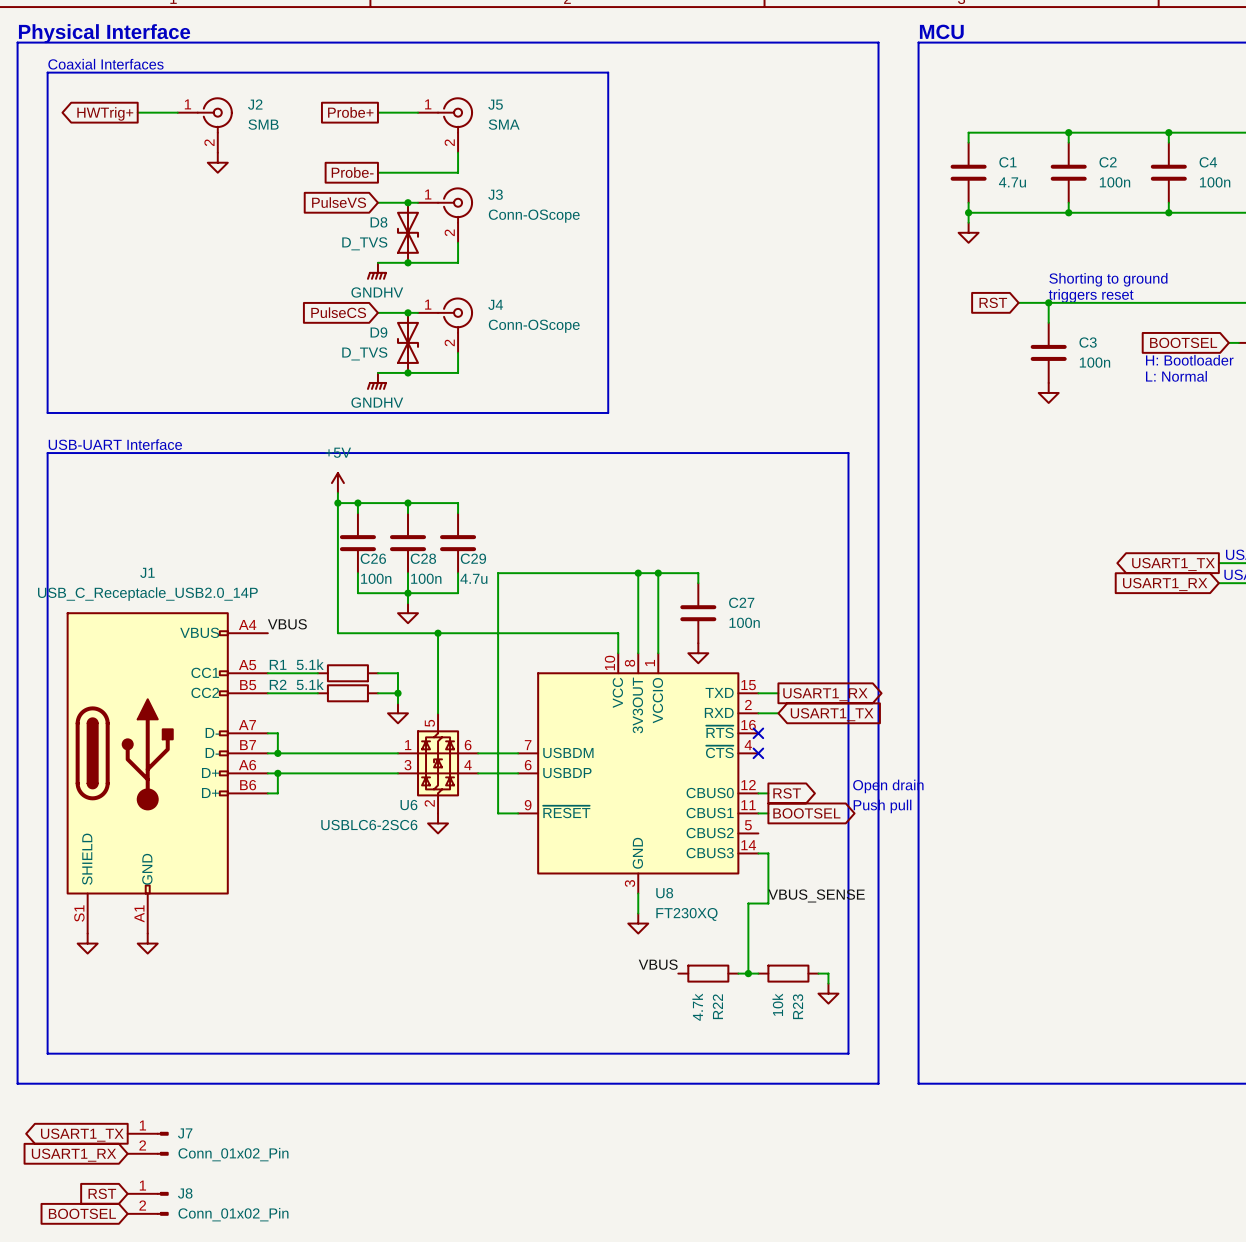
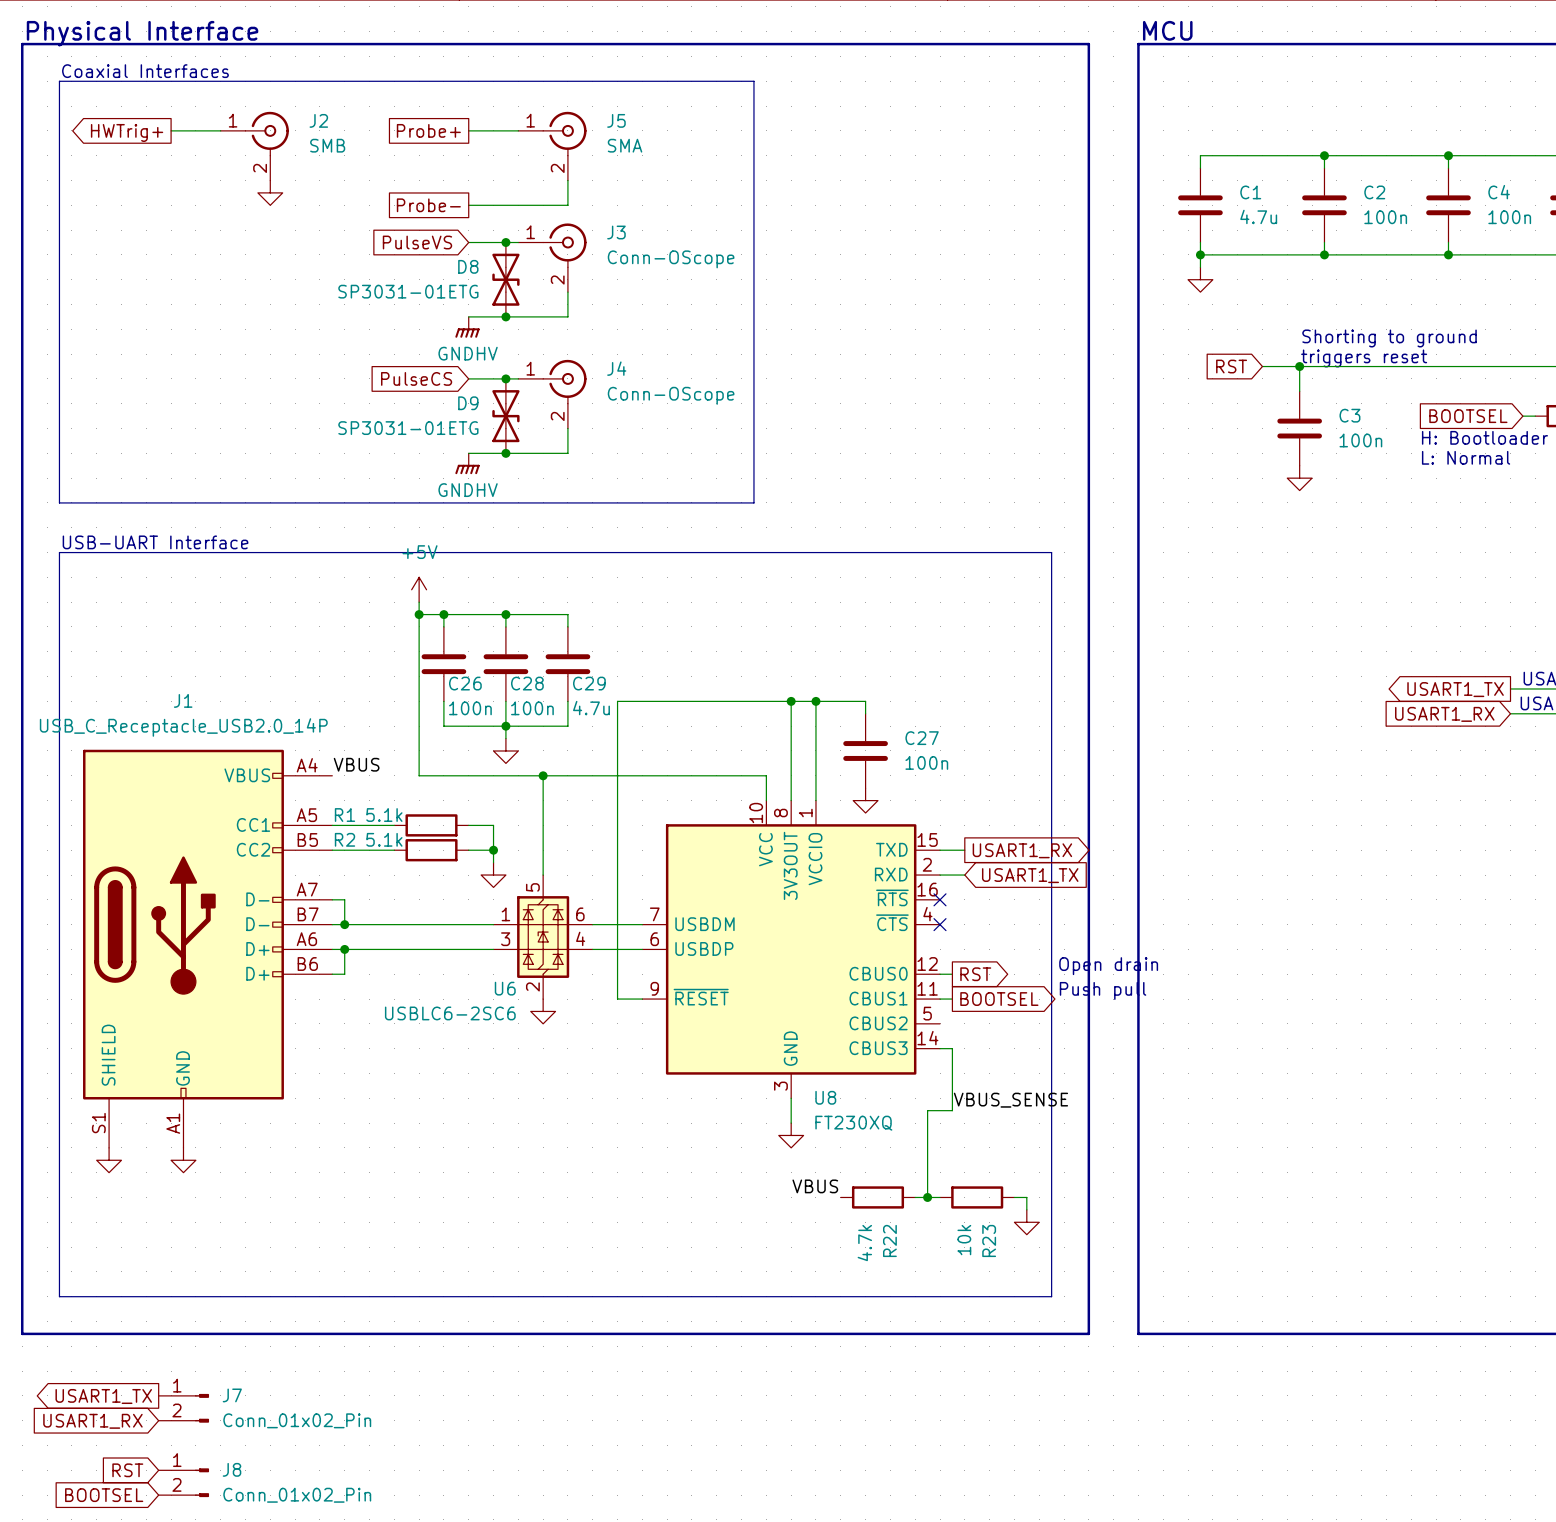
D8 value: D_TVS (364, 243) -> SP3031-01ETG (408, 291)
D9 value: D_TVS (364, 353) -> SP3031-01ETG (408, 428)

